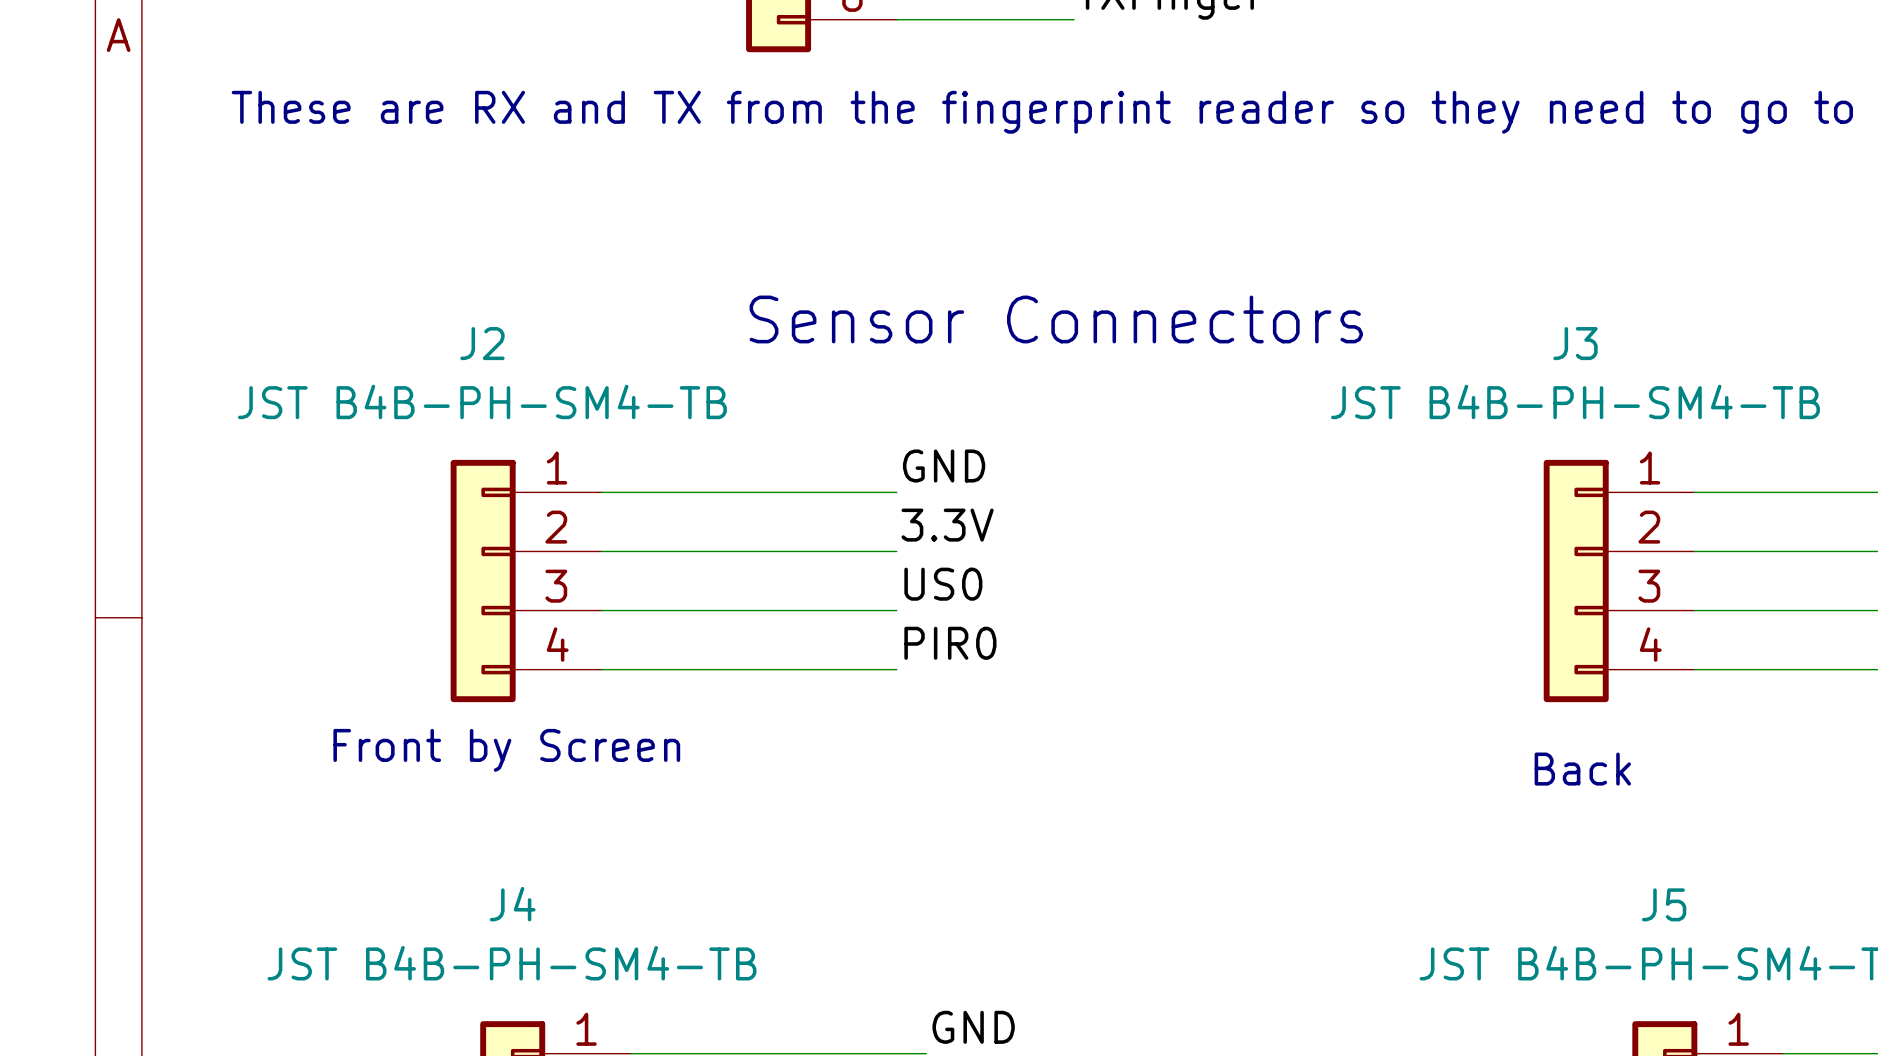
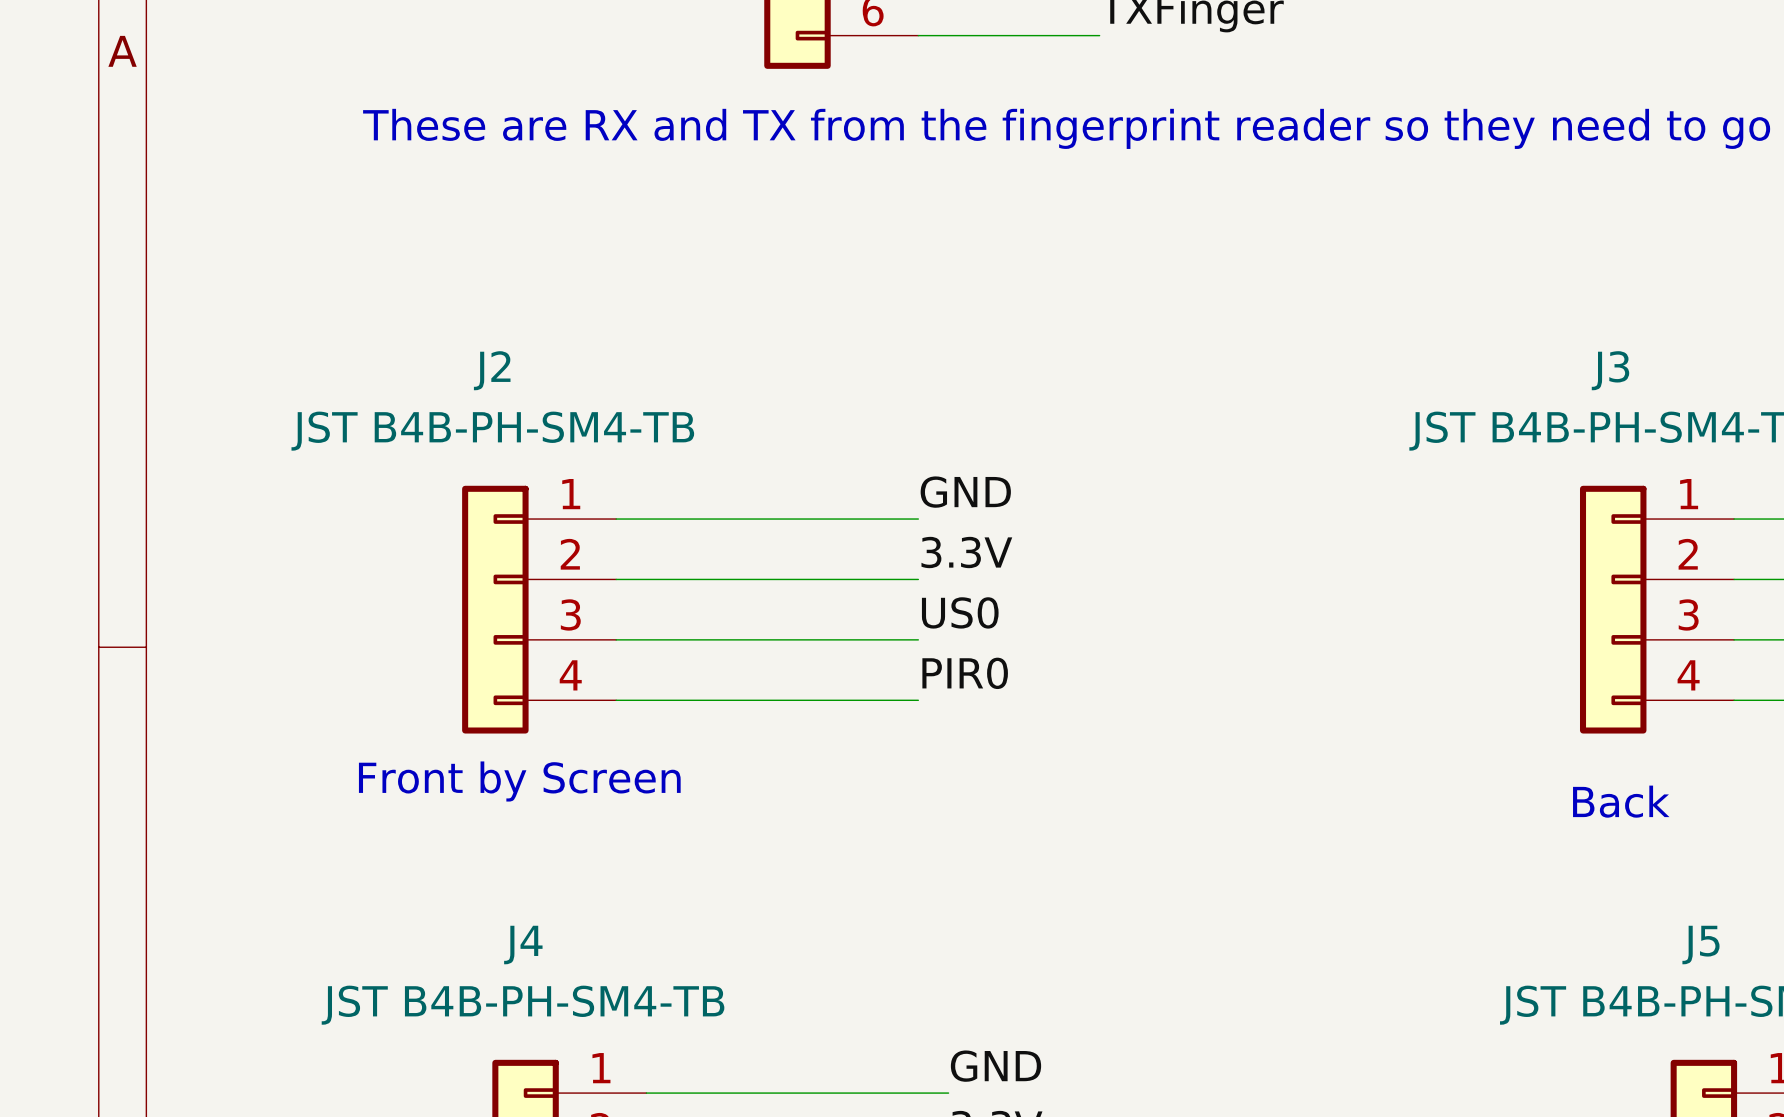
text: Sensor Connectors (1056, 319) -> none

